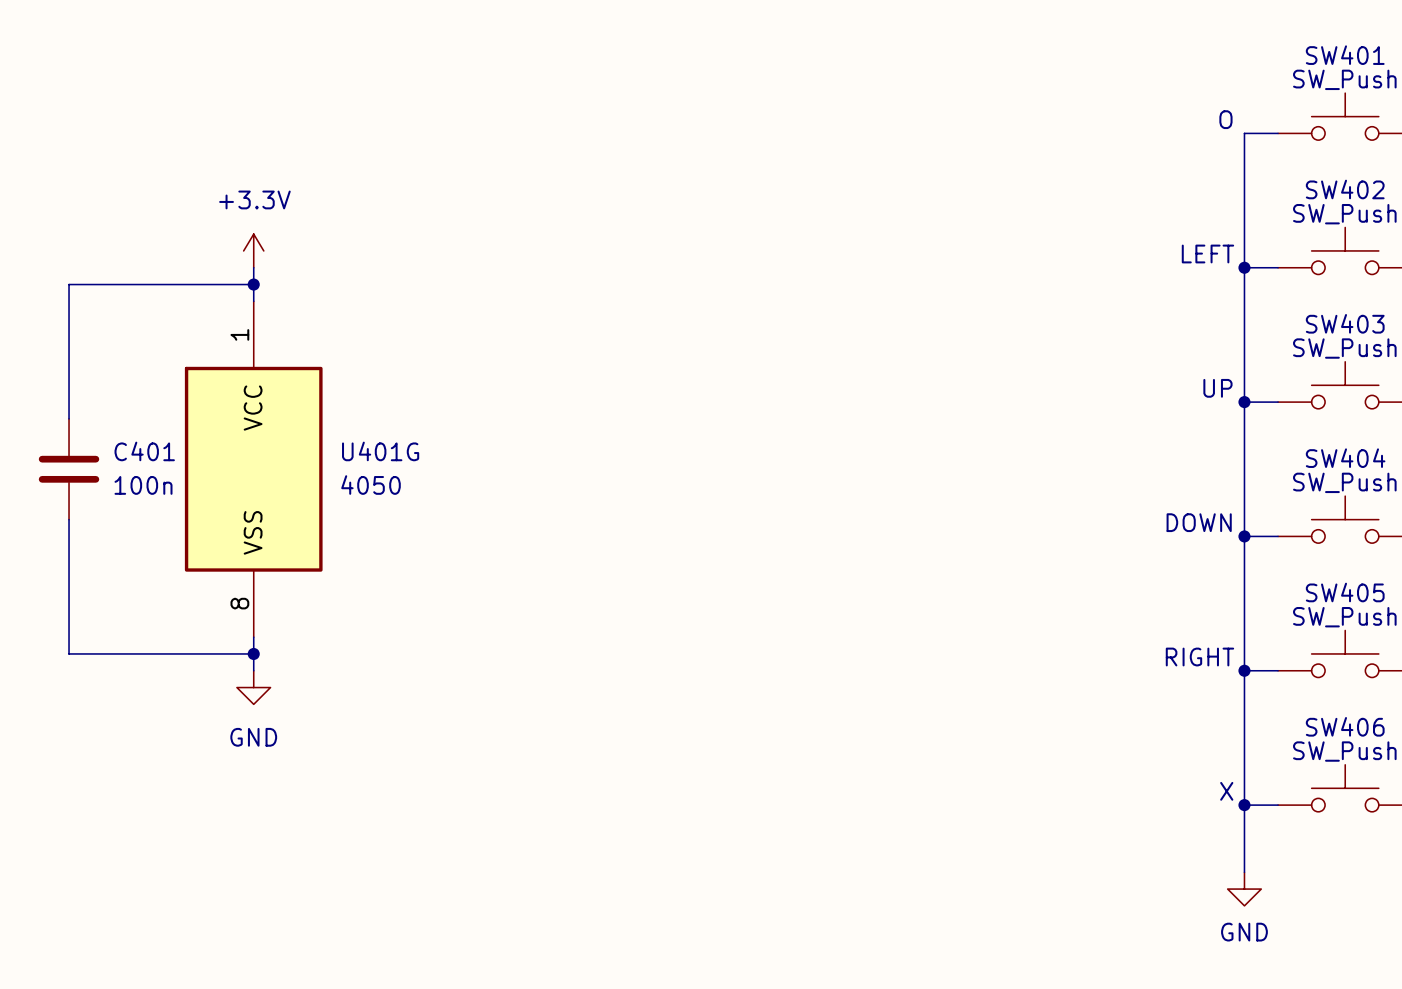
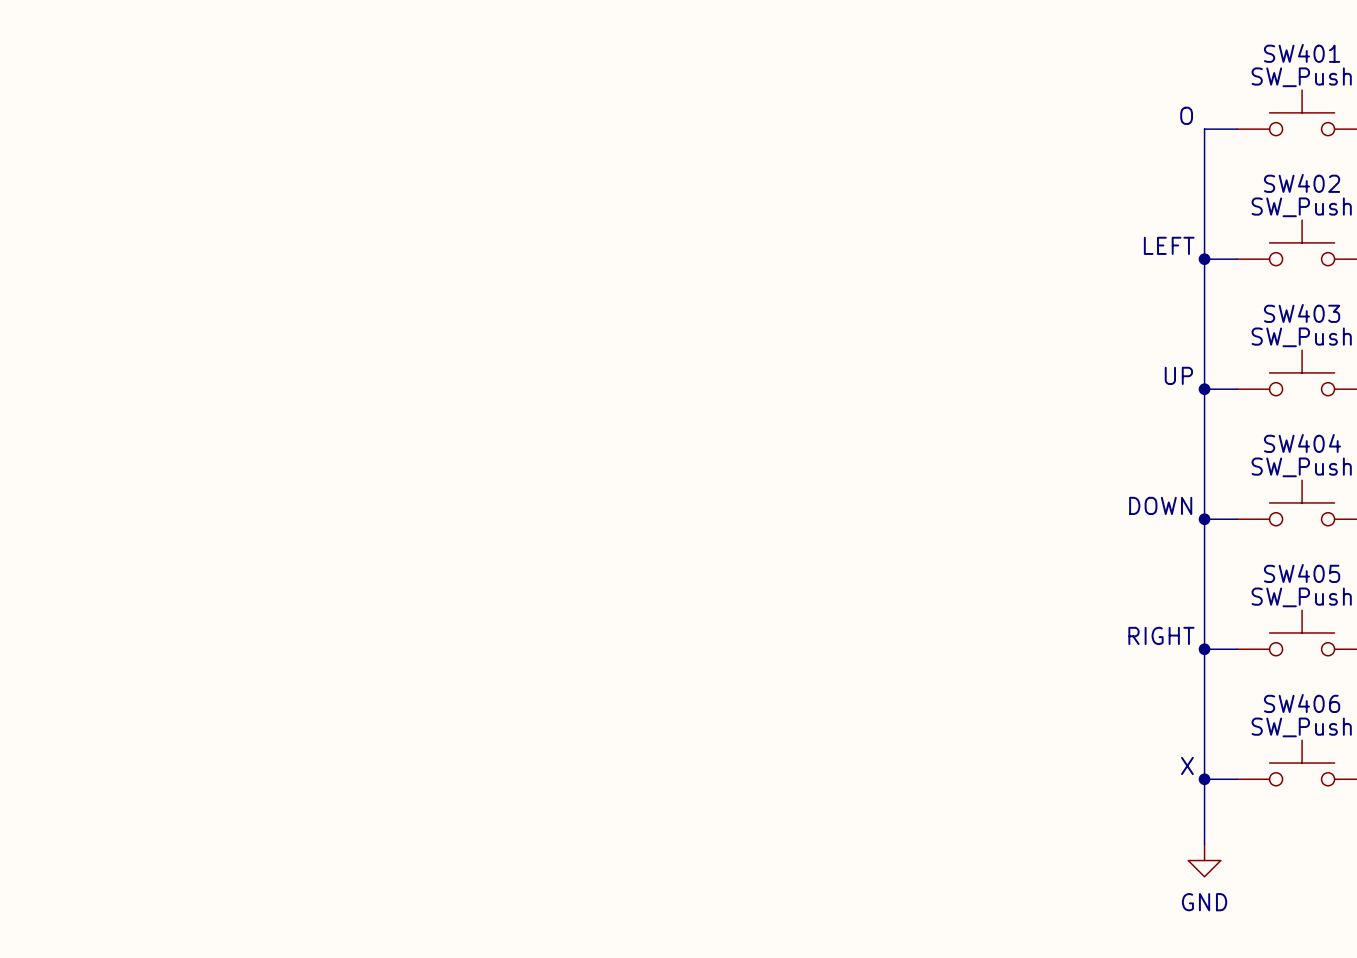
power symbol: +3.3V (253, 250) -> none
wire: (253, 267) (253, 301) -> none
wire: (253, 284) (69, 284) (69, 418) -> none
junction: (253, 284) -> none
C401: 100n (69, 469) -> none
U401G: 4050 (253, 469) -> none
wire: (69, 519) (69, 653) (253, 653) -> none
wire: (253, 637) (253, 670) -> none
junction: (253, 653) -> none
power symbol: GND (253, 687) -> none

